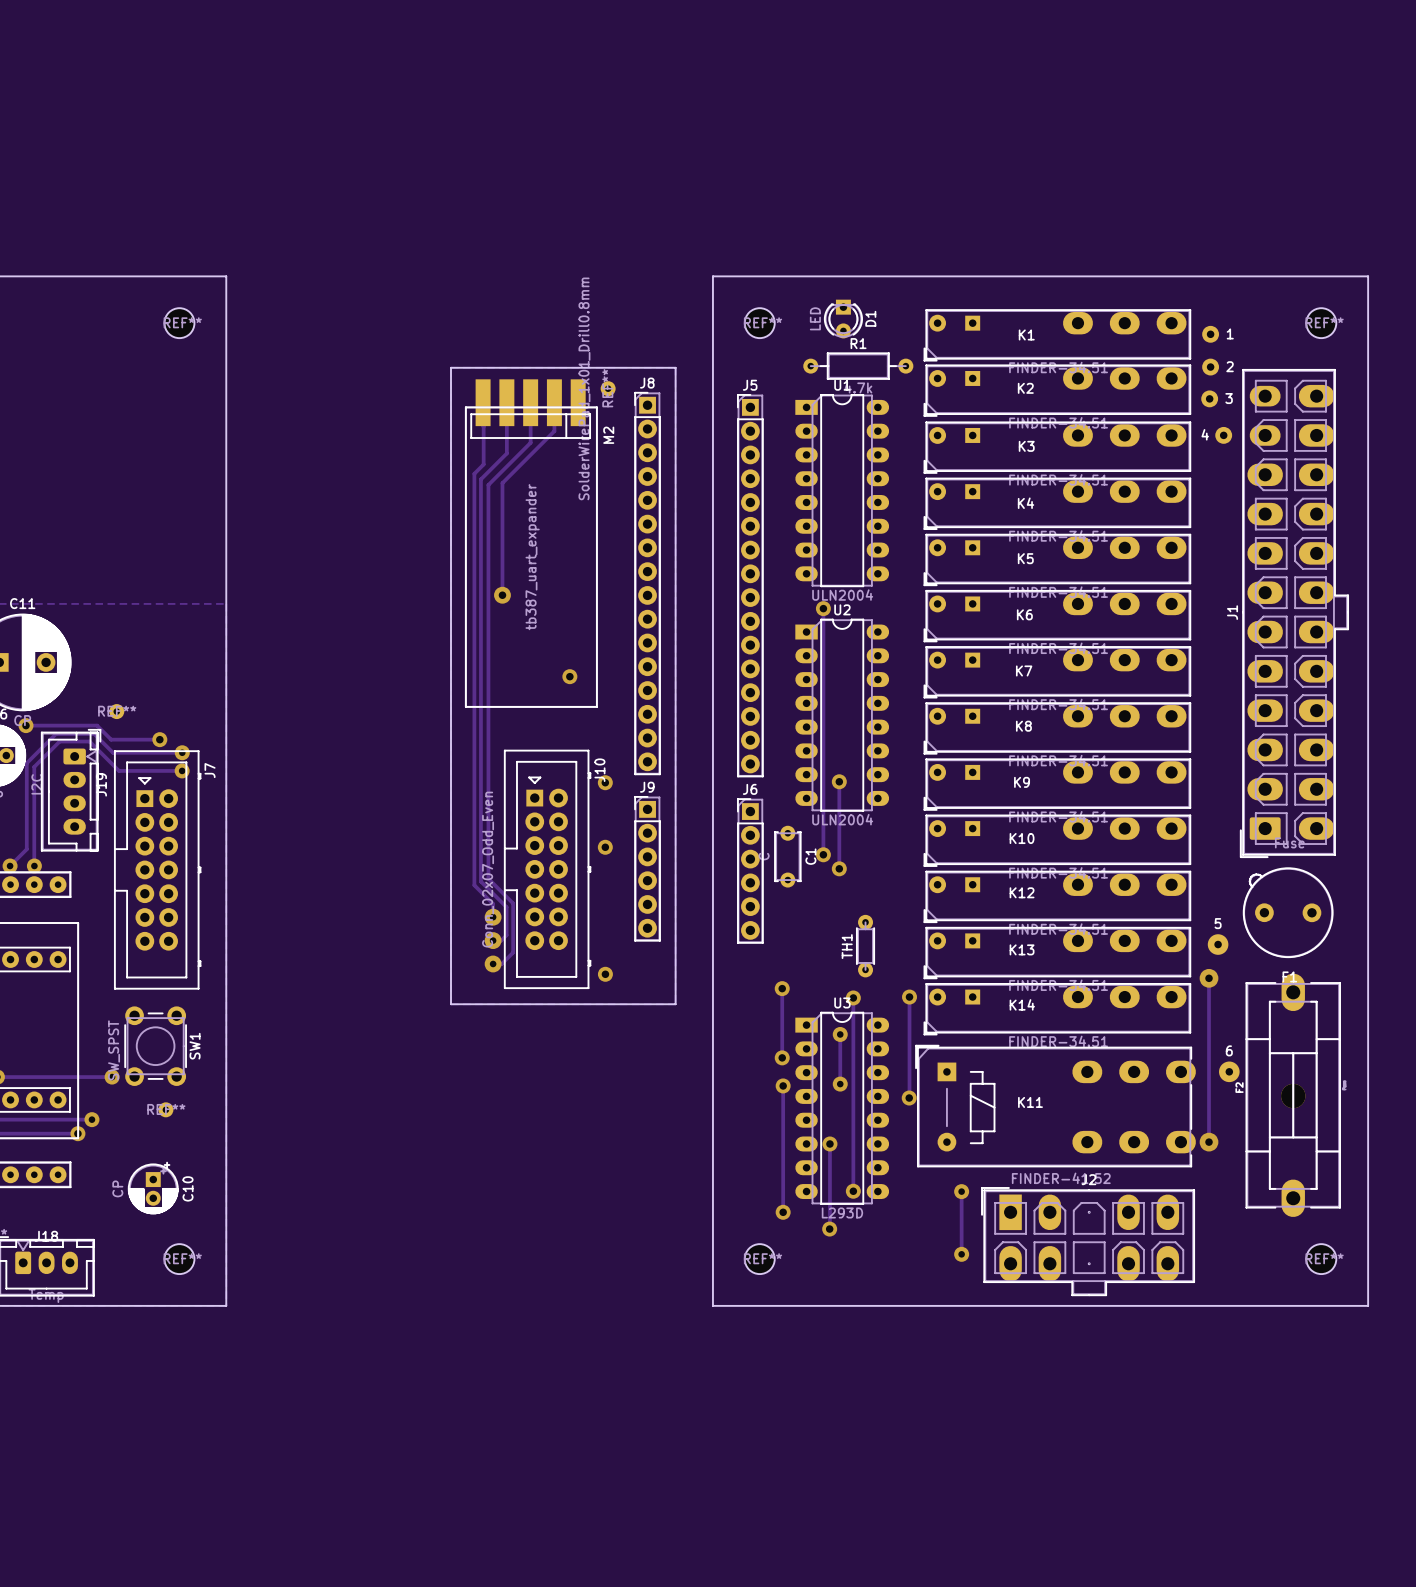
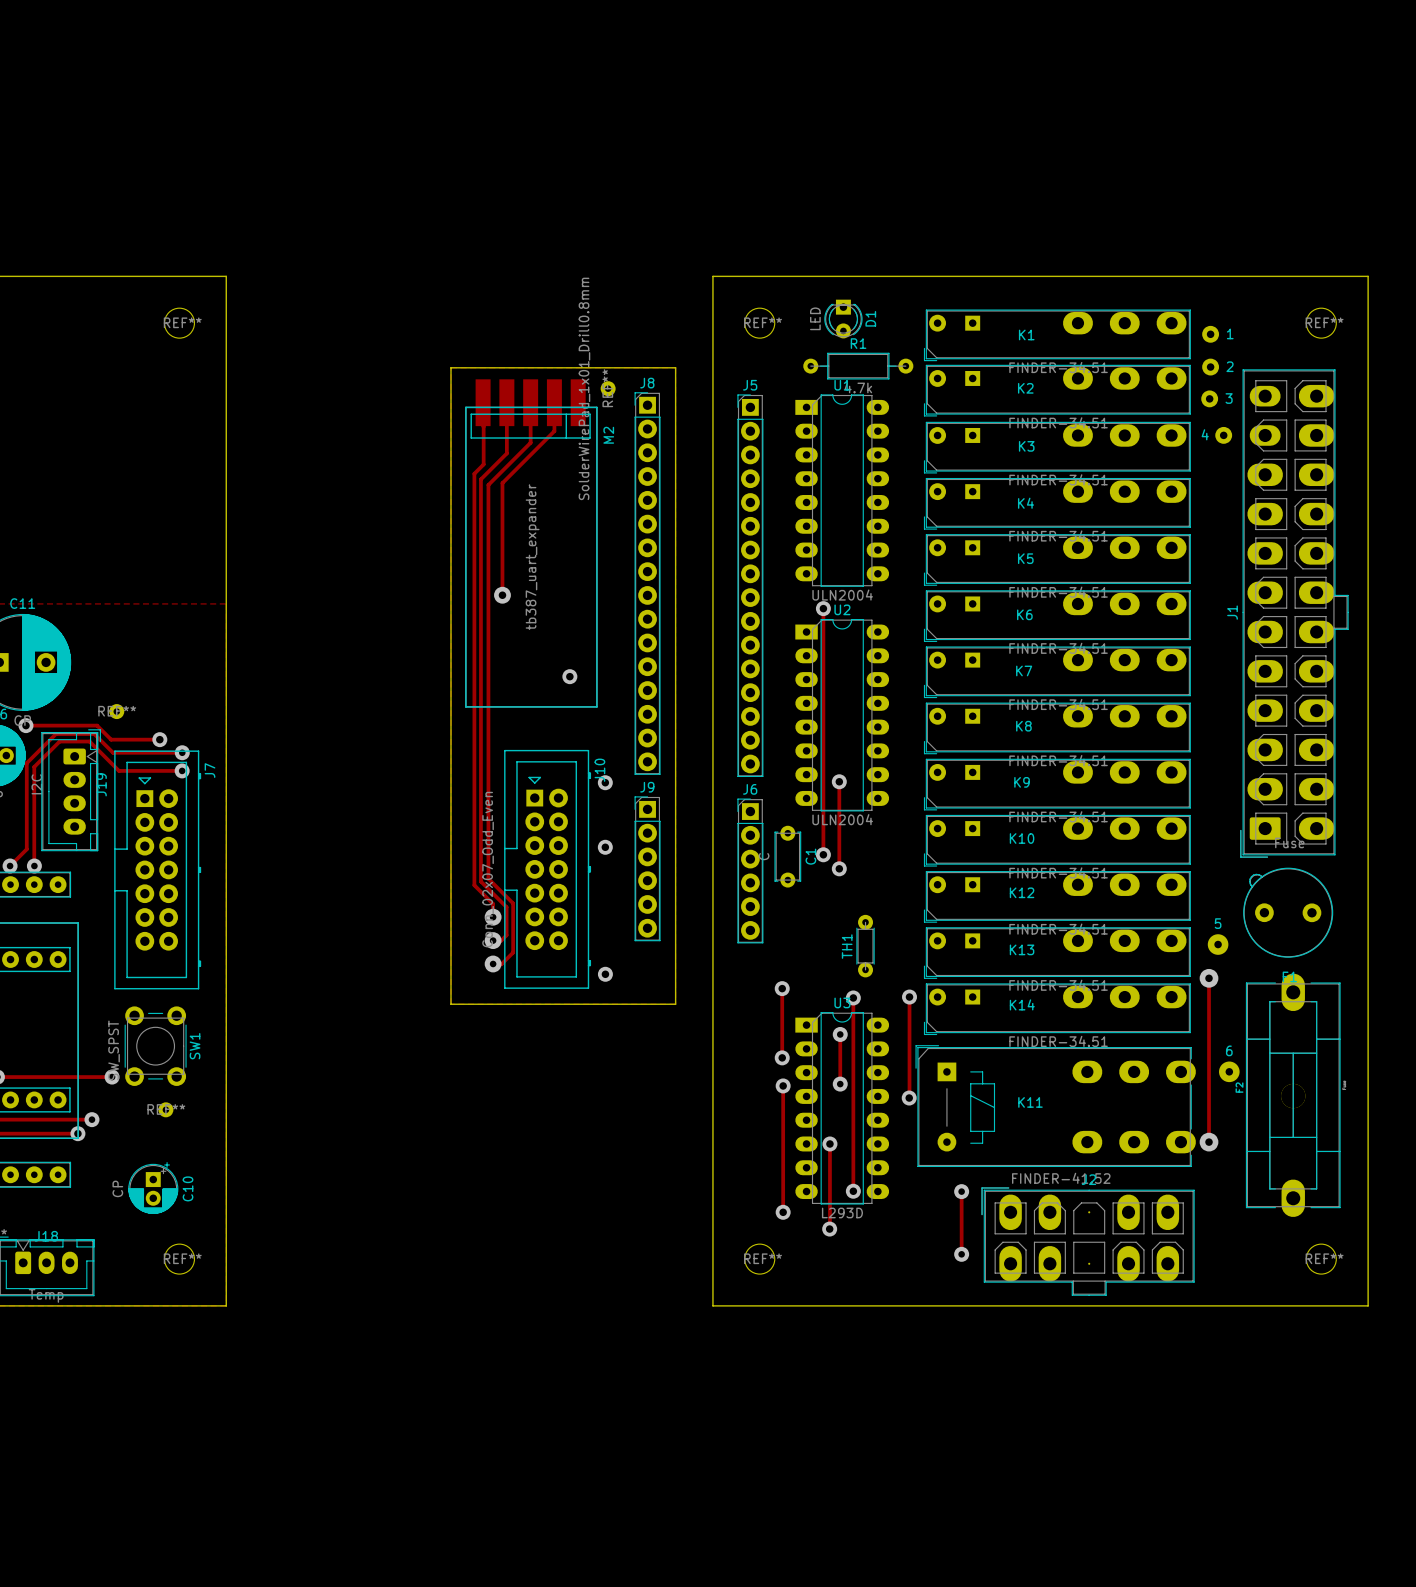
J2 footprint: [981, 1187, 1195, 1296] -> [981, 1187, 1195, 1296]

